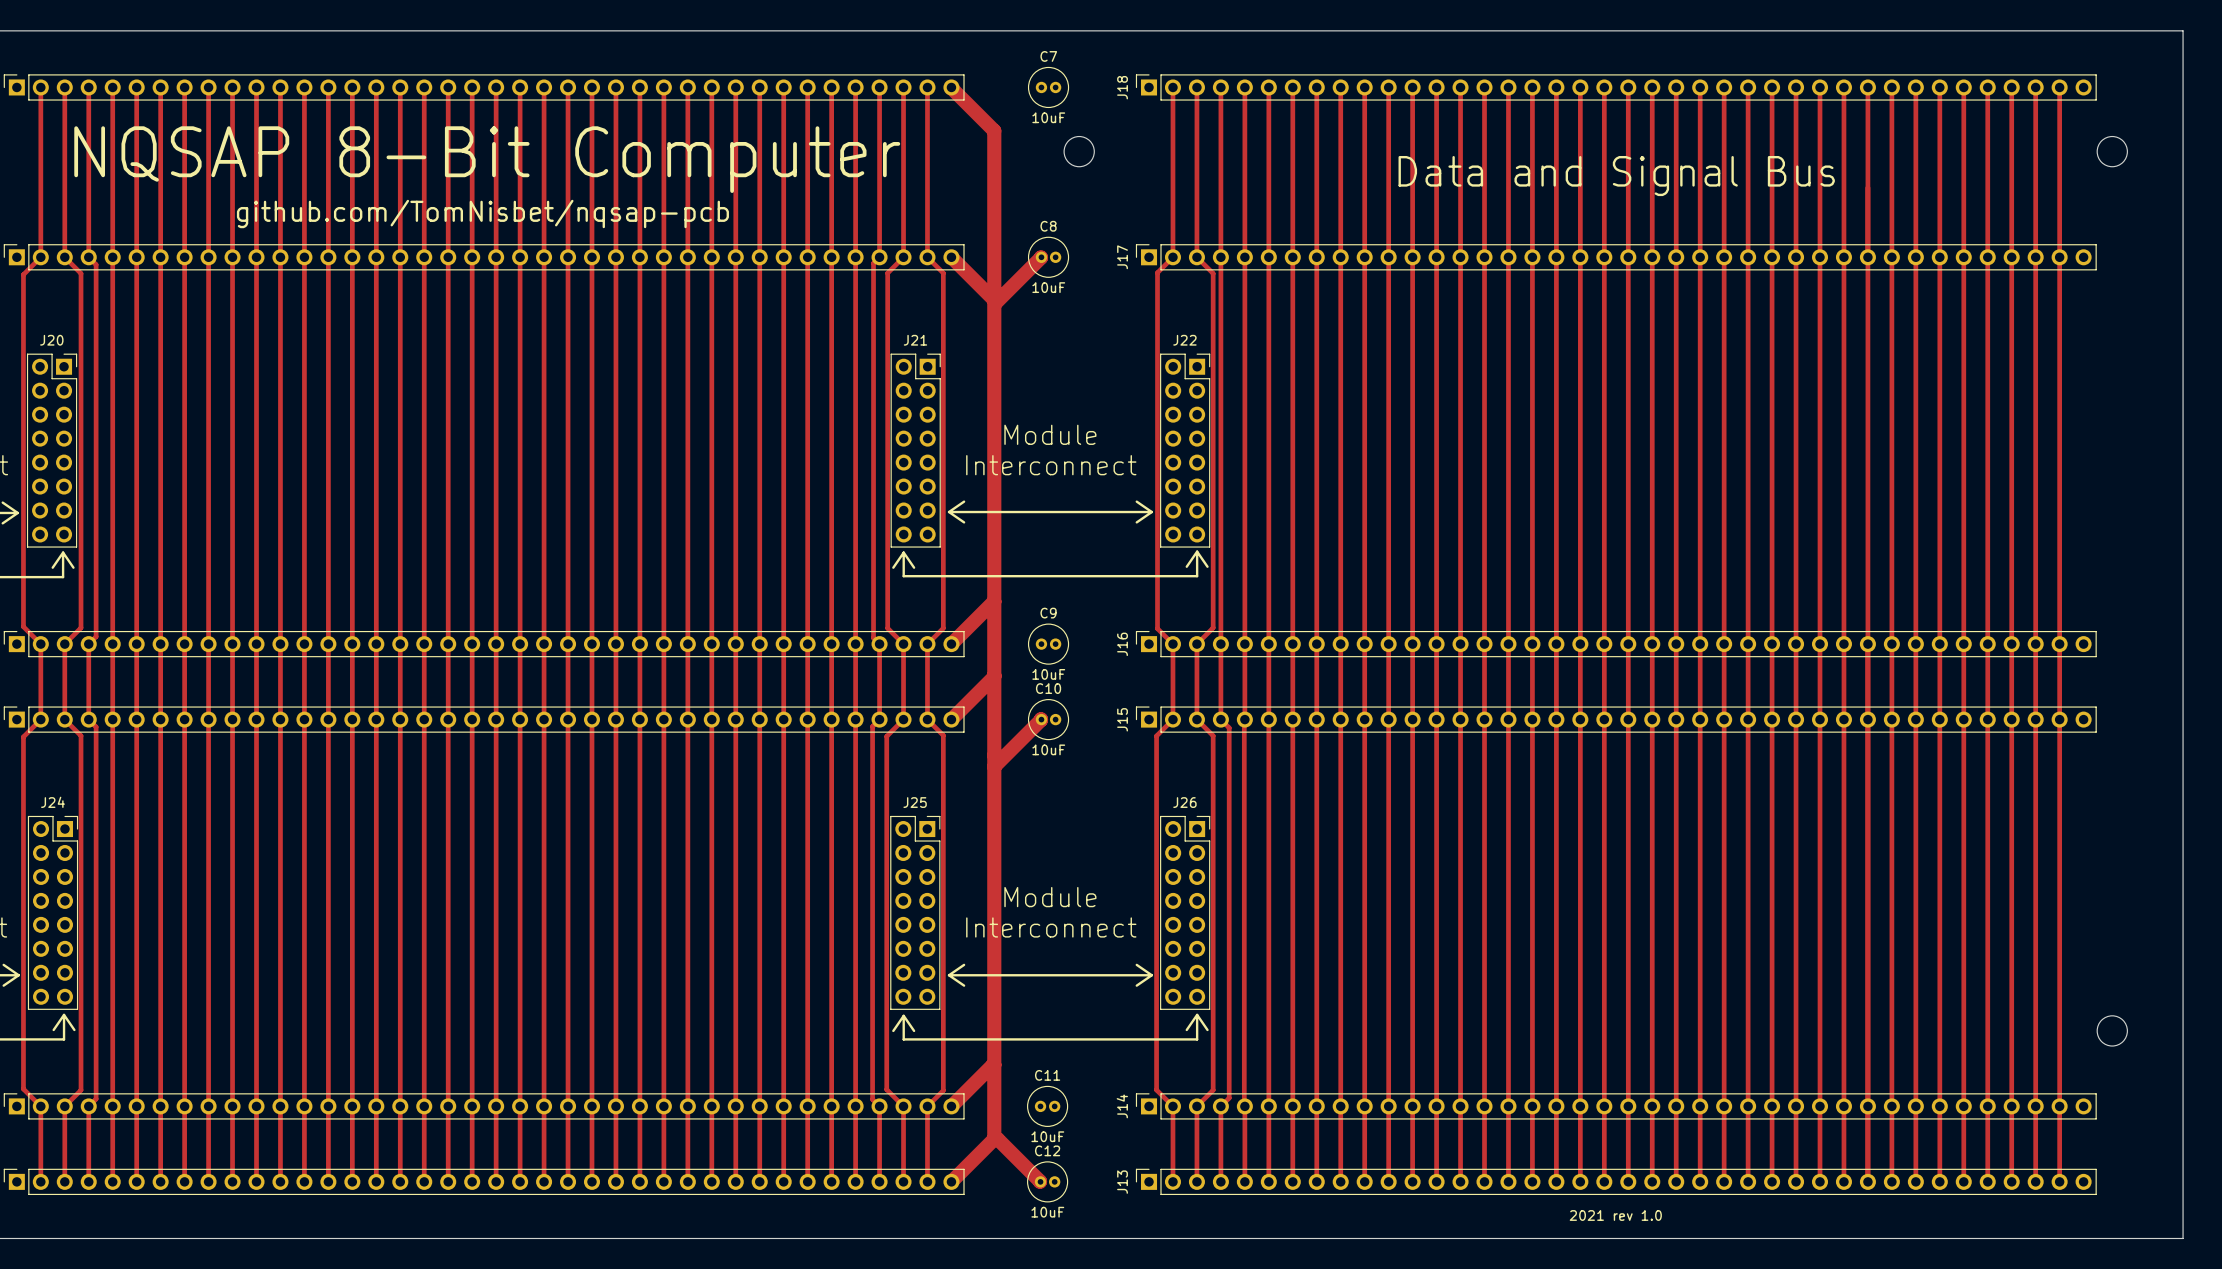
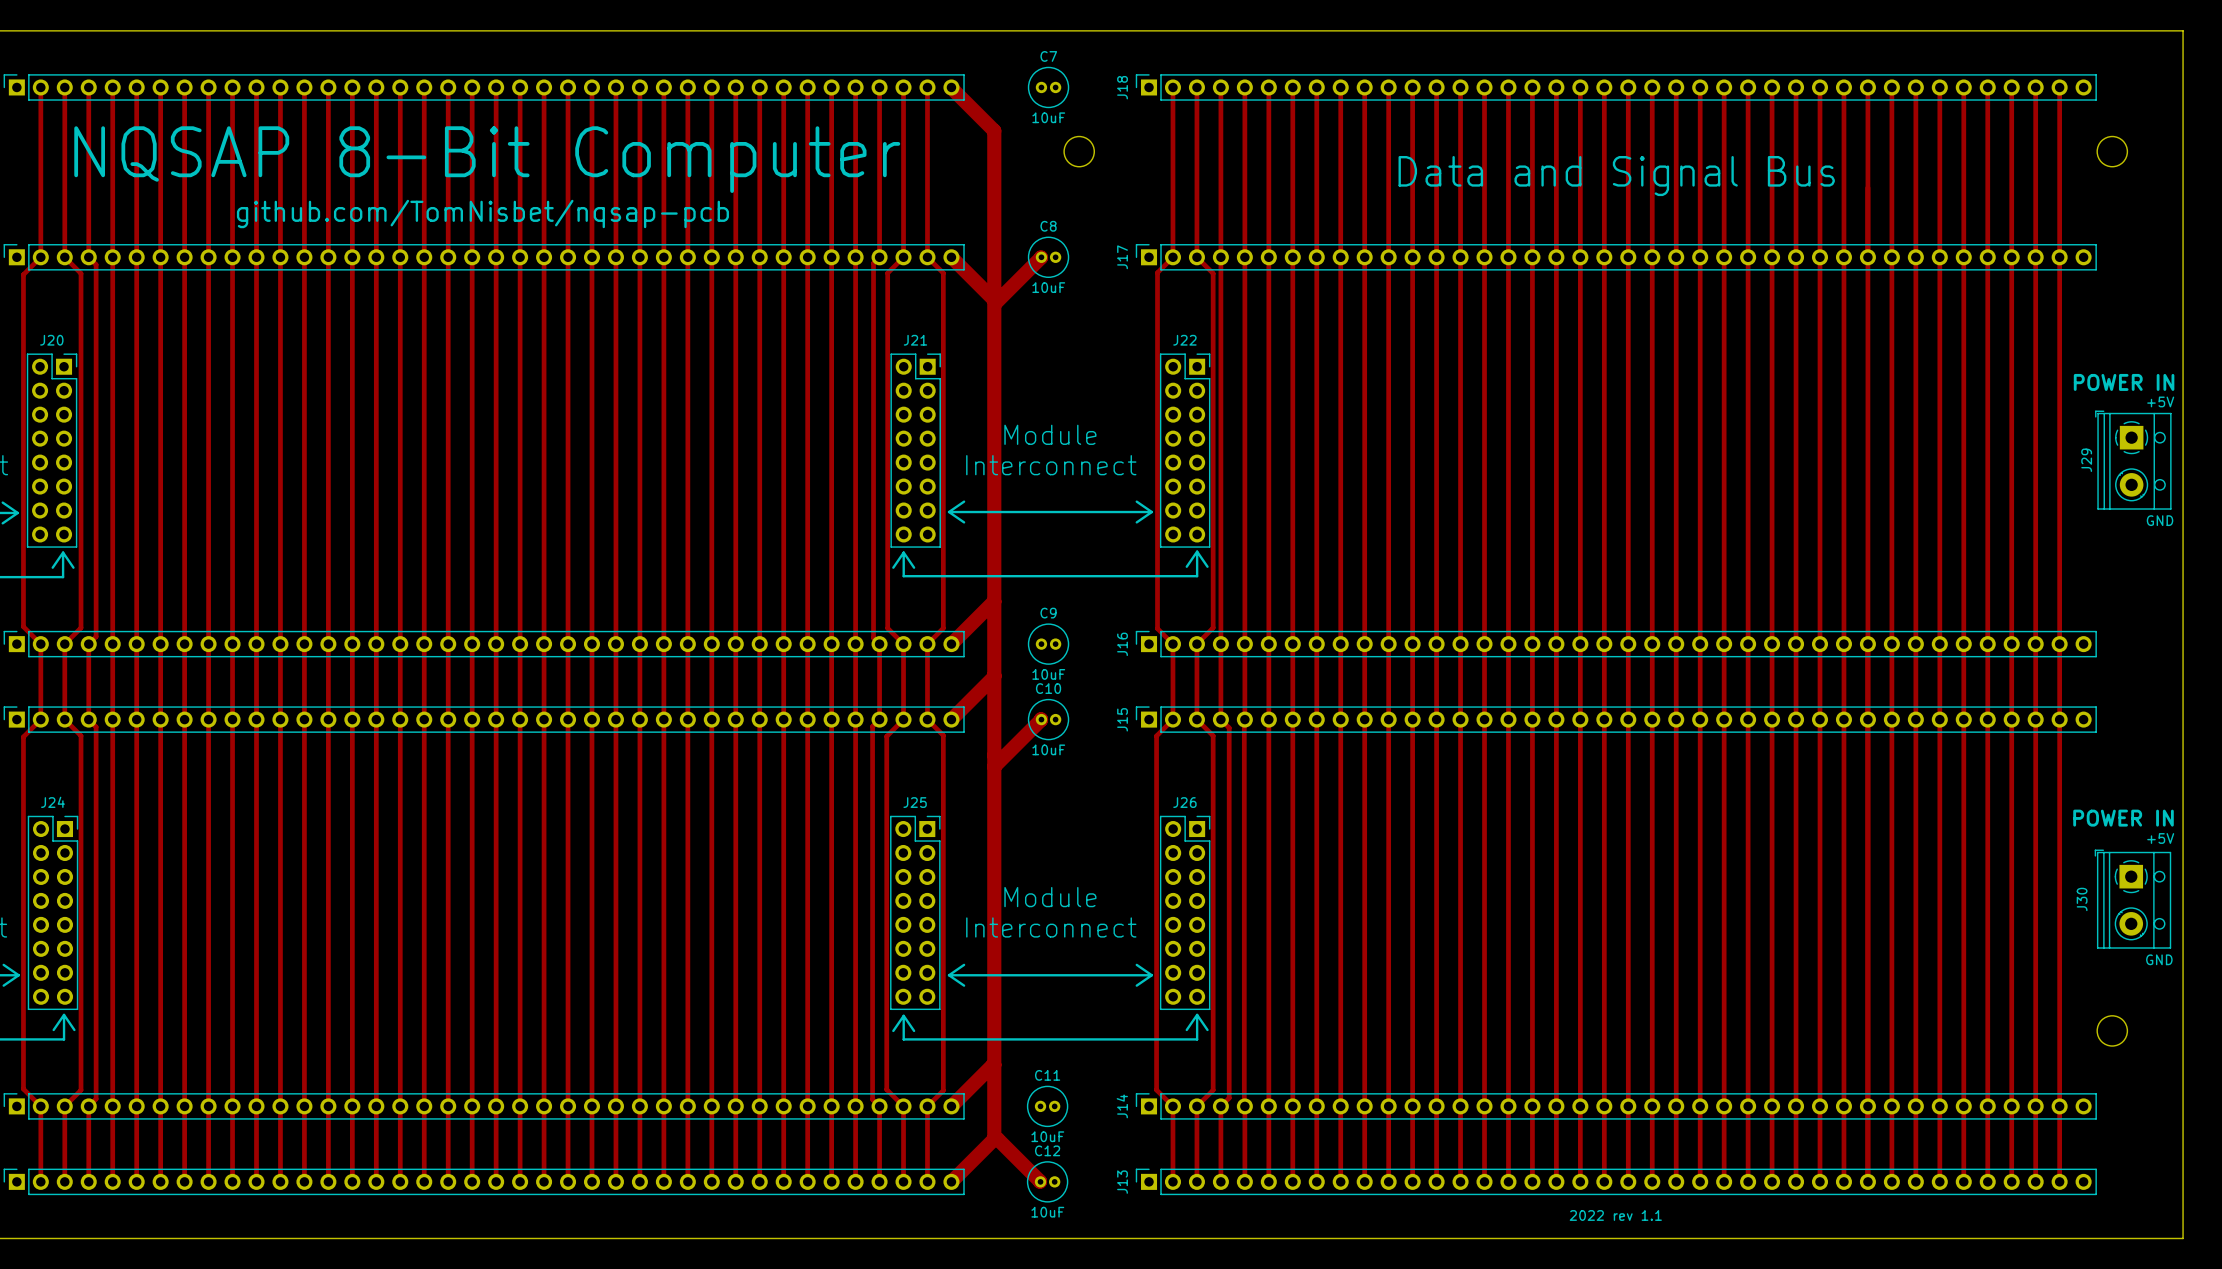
J29: none -> POWER IN (2133, 460)
J30: none -> POWER IN (2132, 899)
text: 2021 rev 1.0 (1615, 1215) -> 2022 rev 1.1 (1615, 1215)

